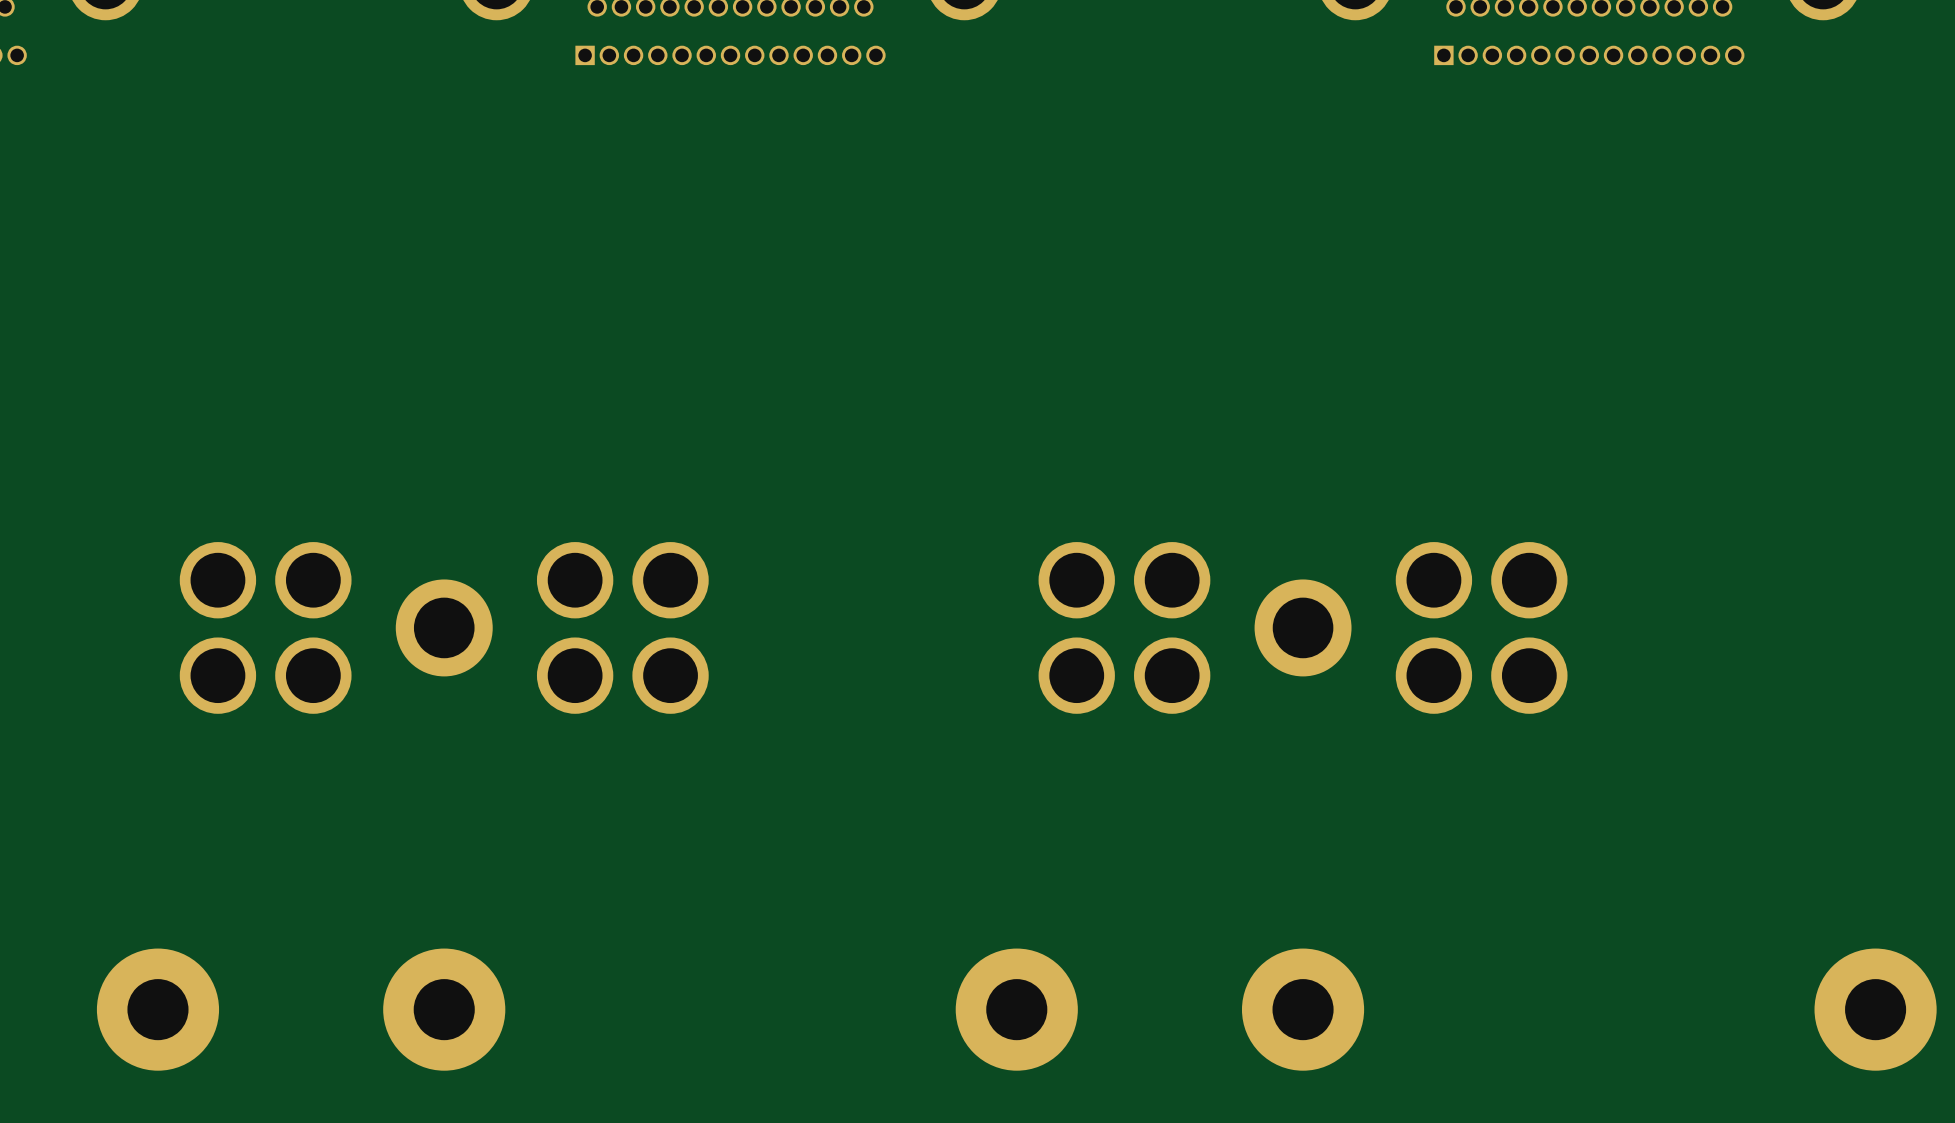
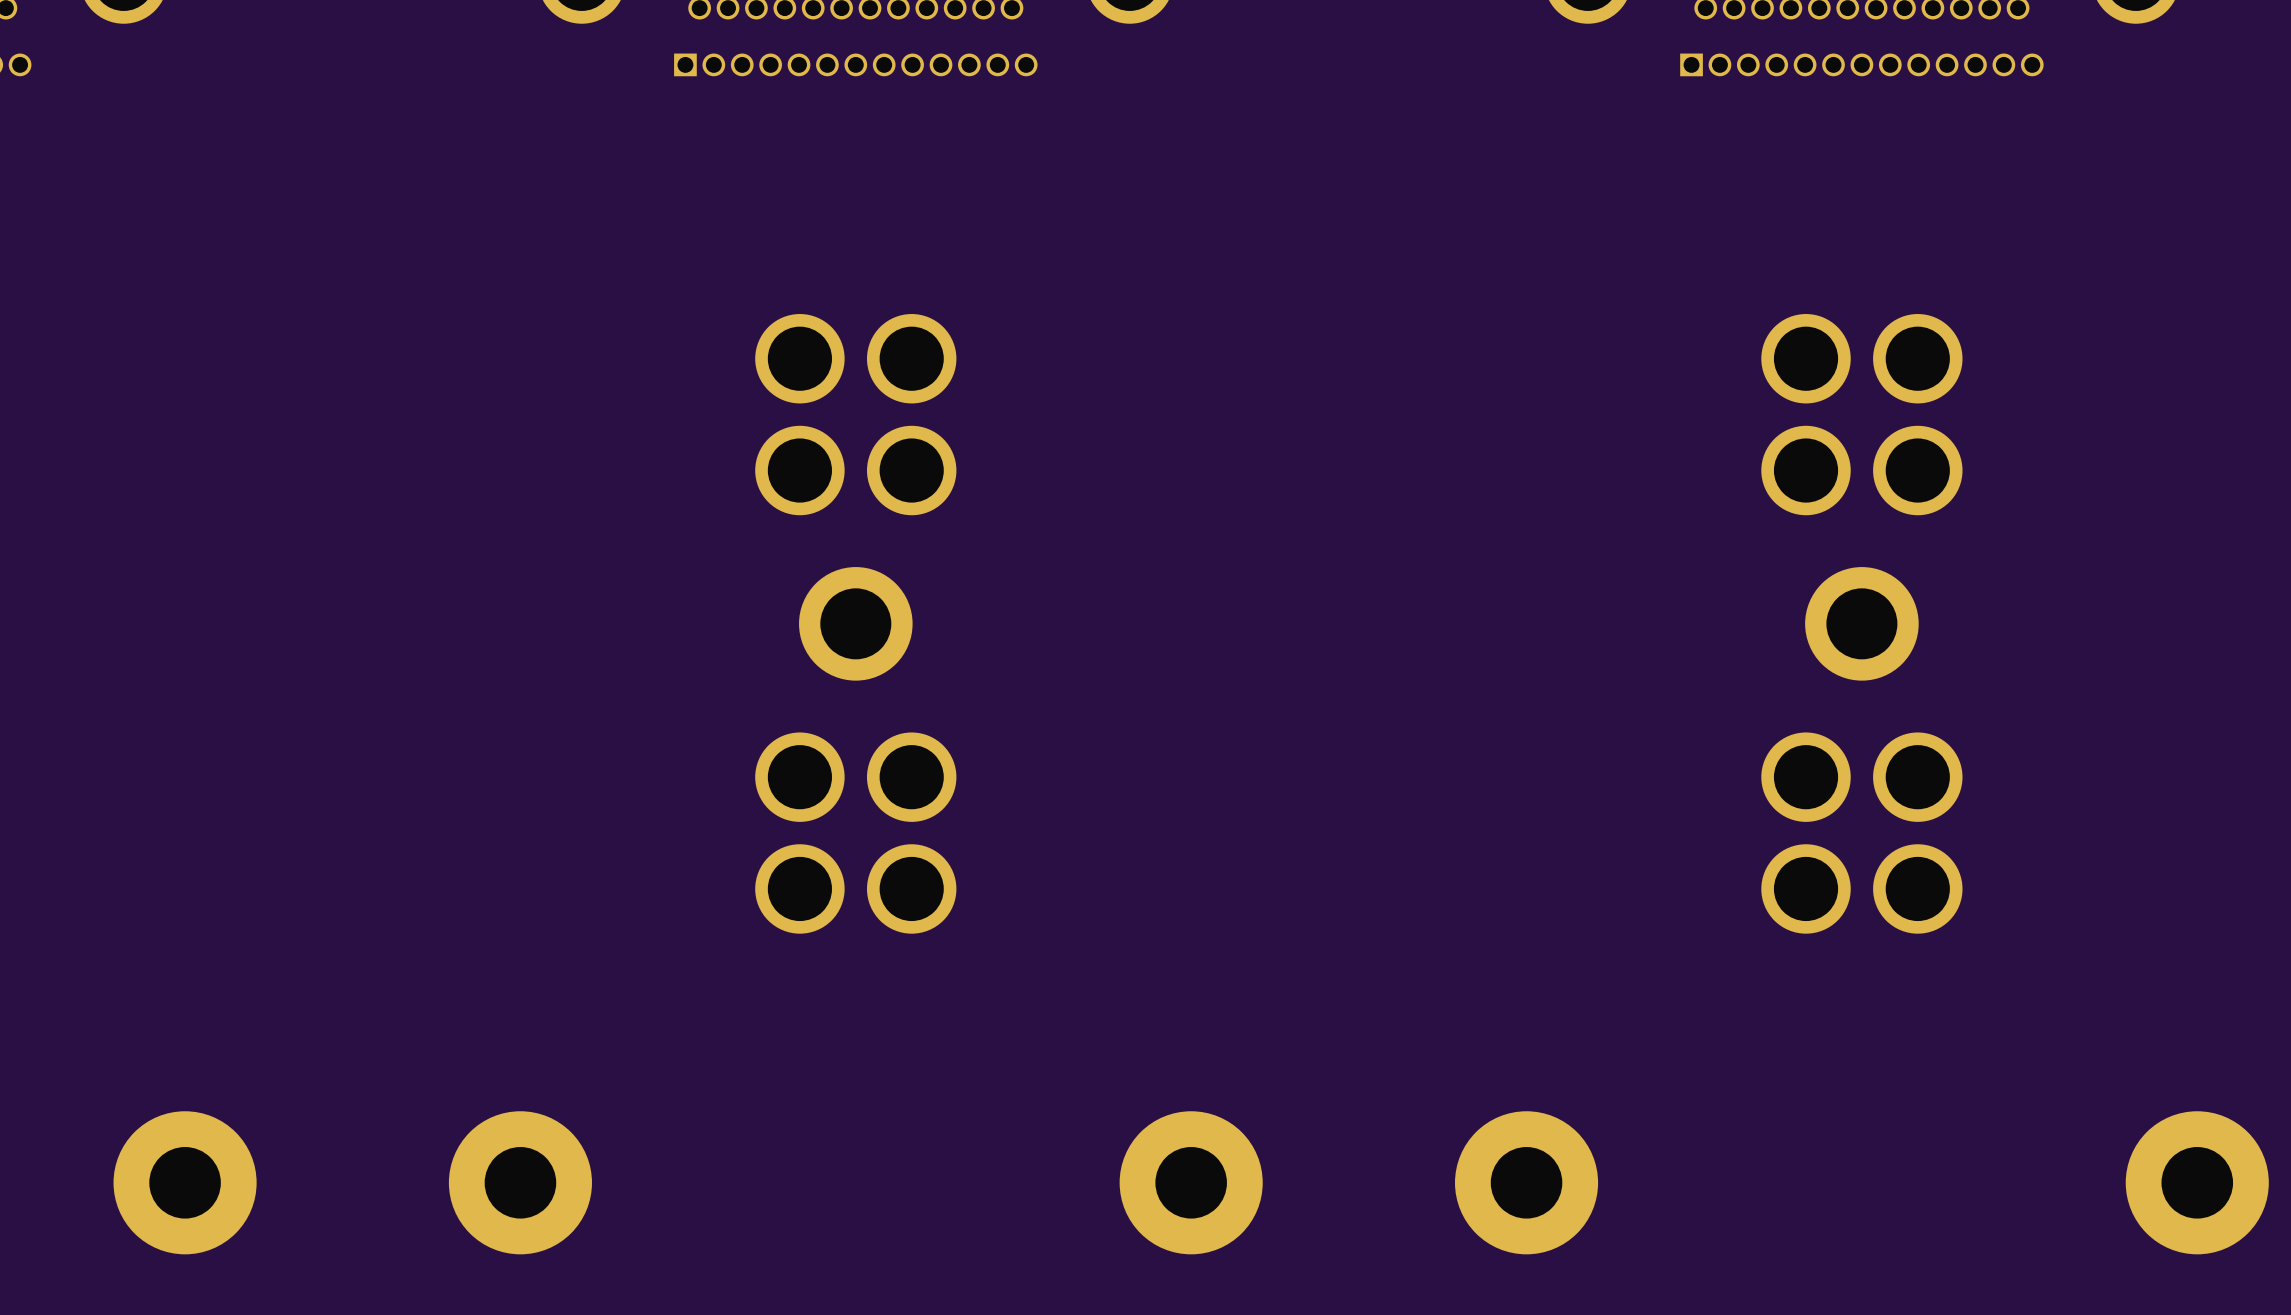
part: none -> (855, 623)
part: none -> (1861, 623)
part: (444, 627) -> none
part: (1303, 627) -> none

